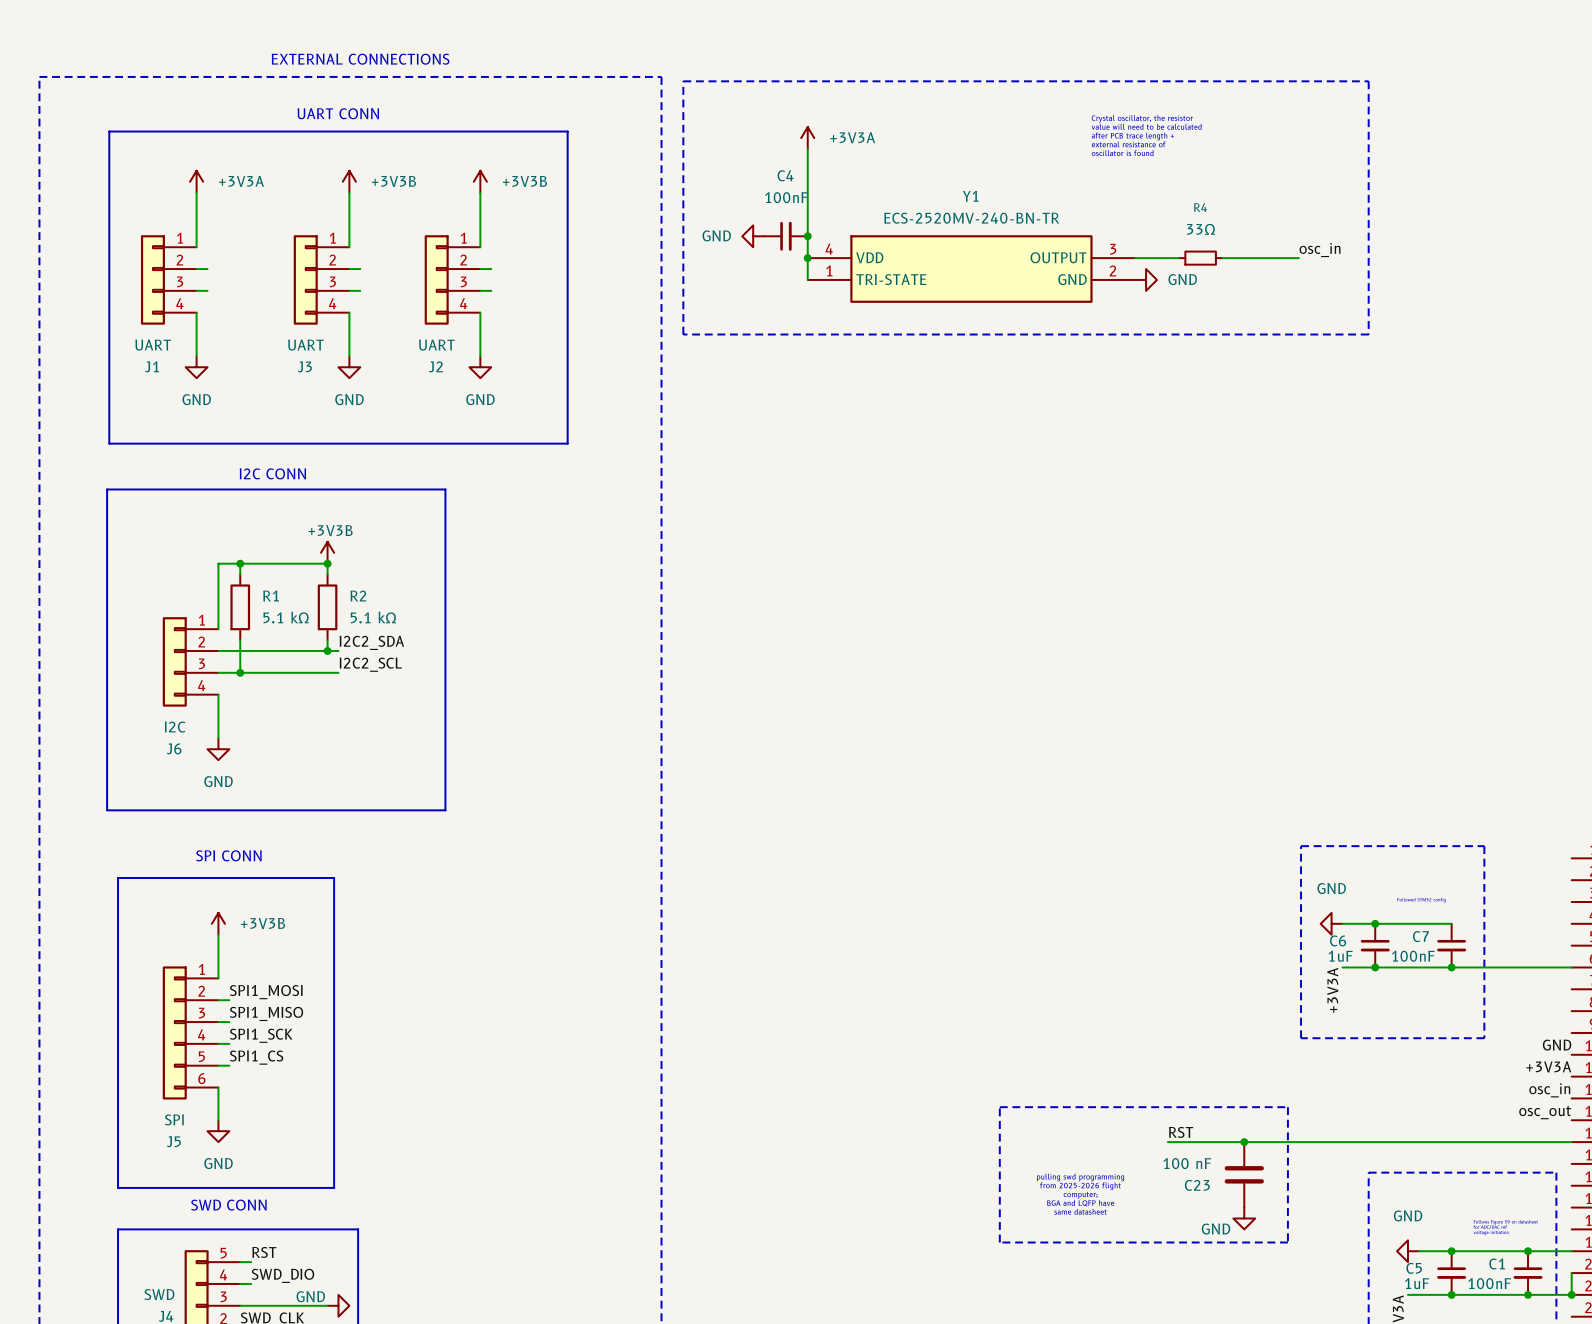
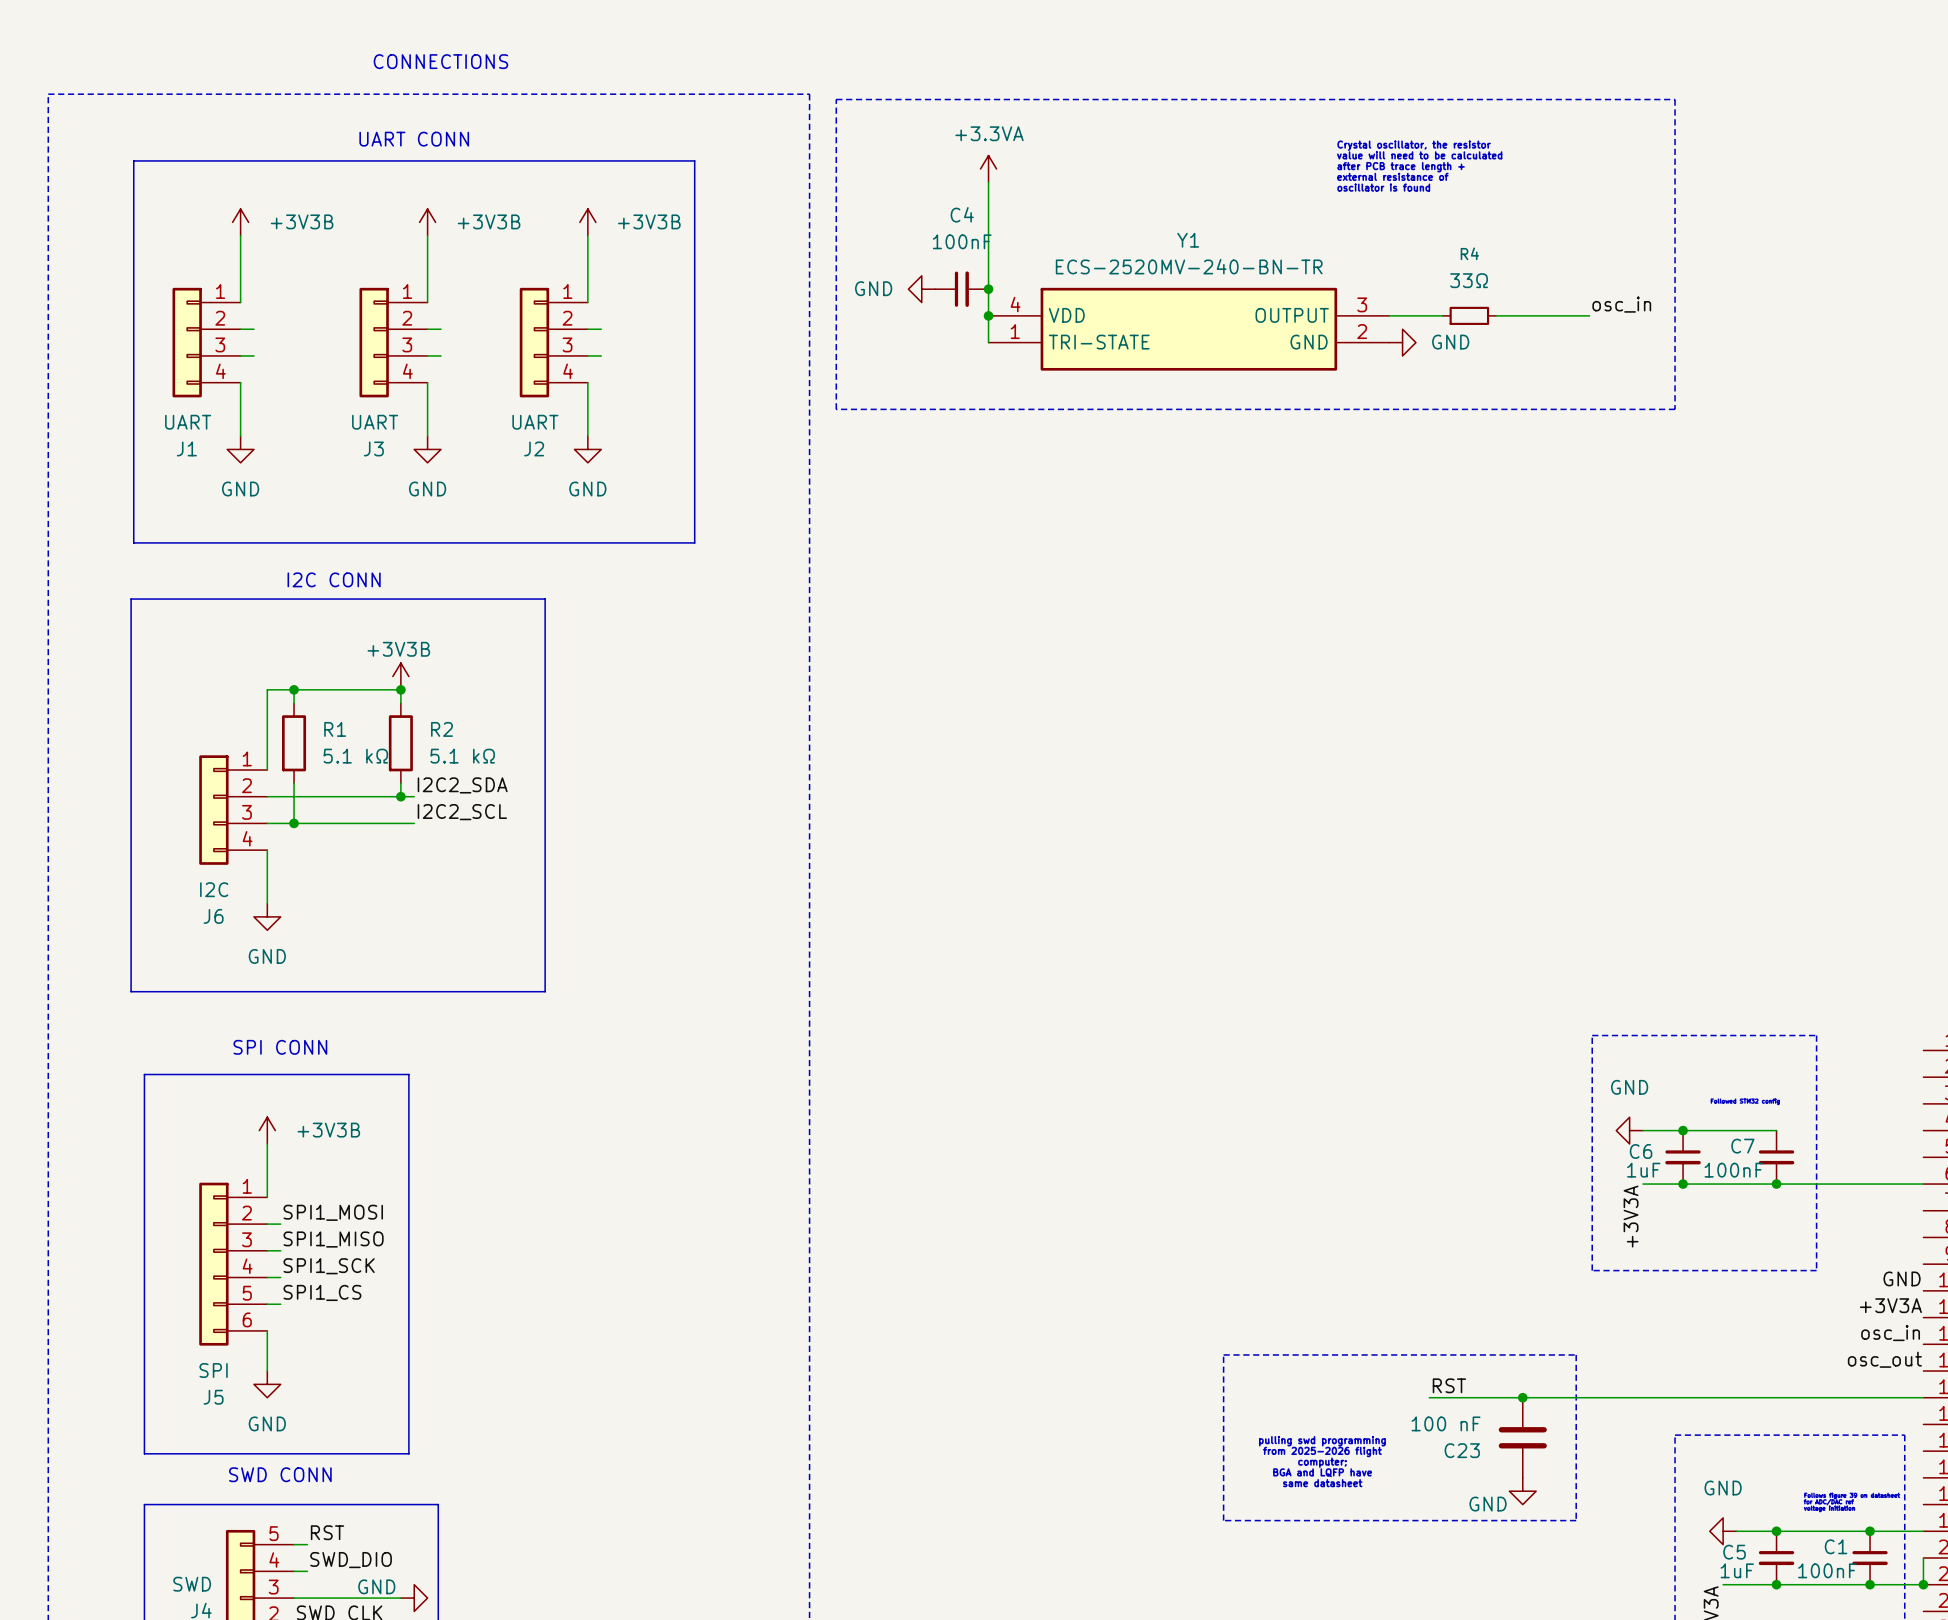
text: EXTERNAL CONNECTIONS (360, 59) -> CONNECTIONS (440, 61)
power symbol: +3V3A (807, 138) -> +3.3VA (988, 168)
power symbol: +3V3A (196, 181) -> +3V3B (240, 222)

